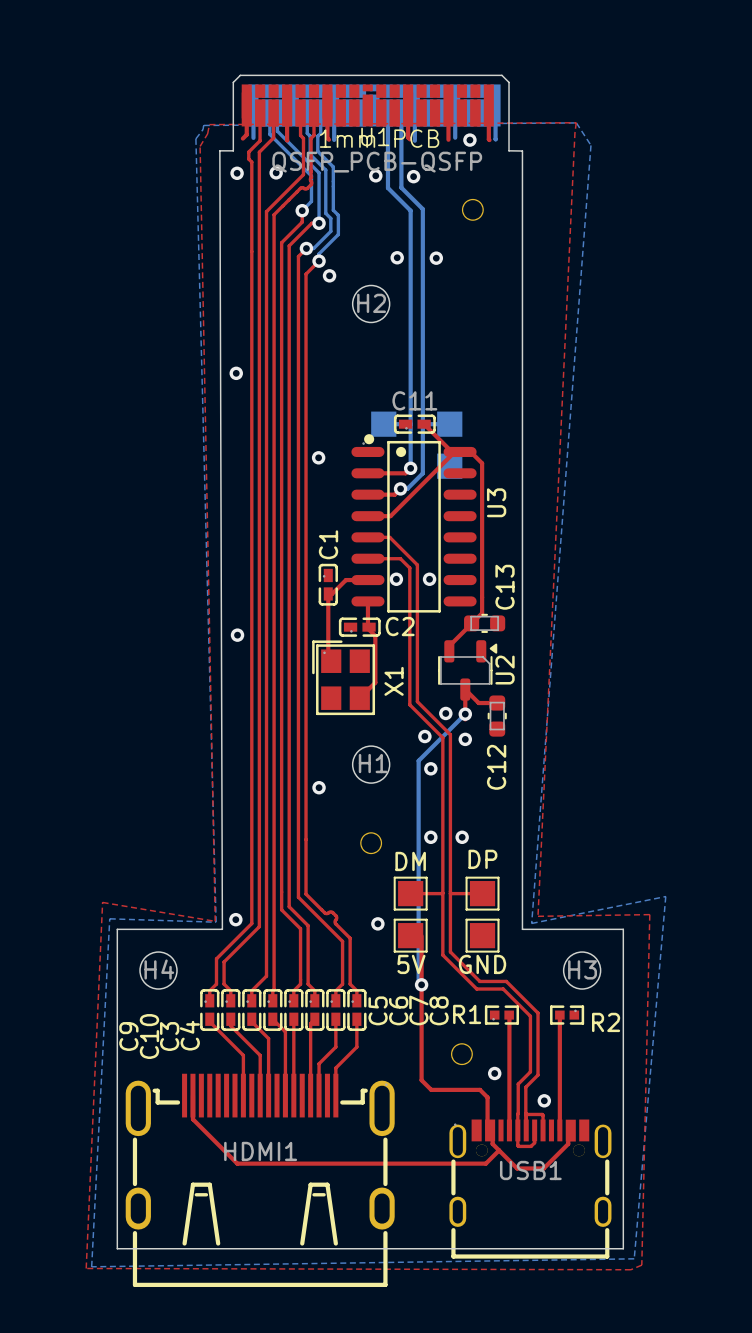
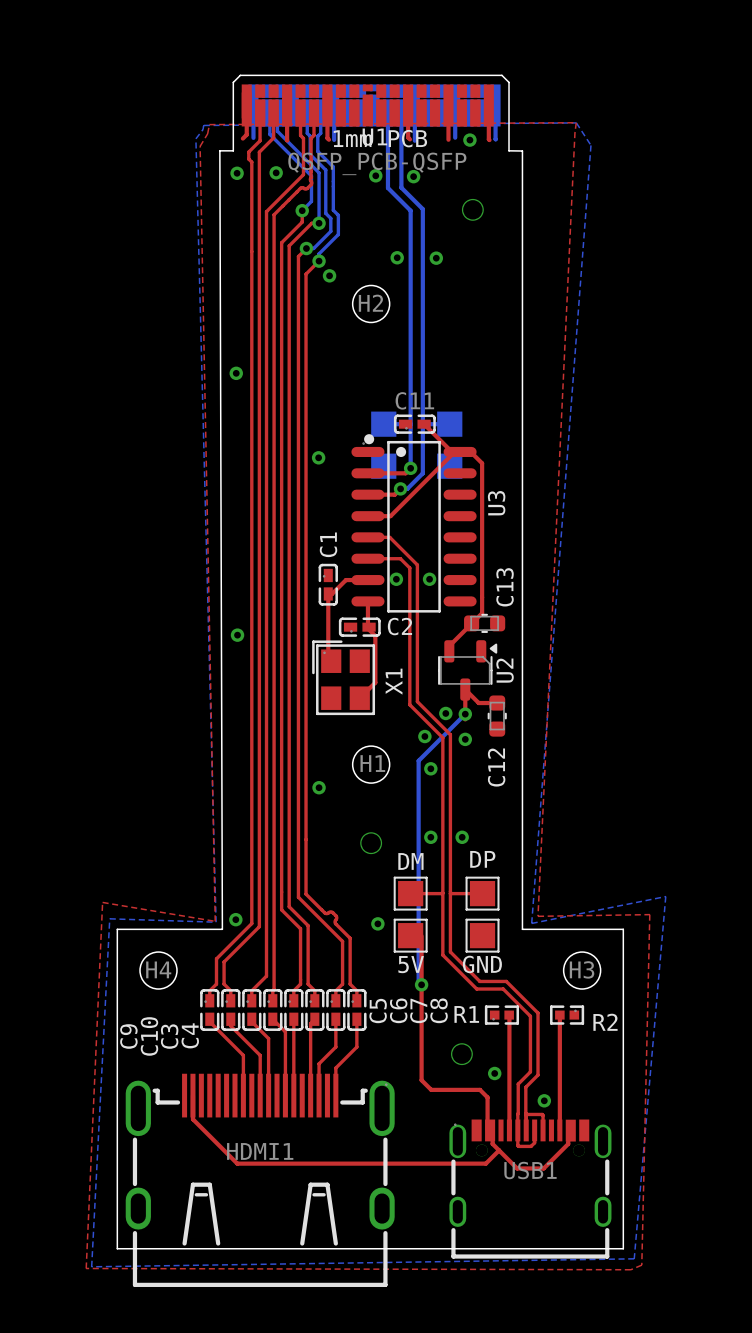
part: none -> (383, 466)

